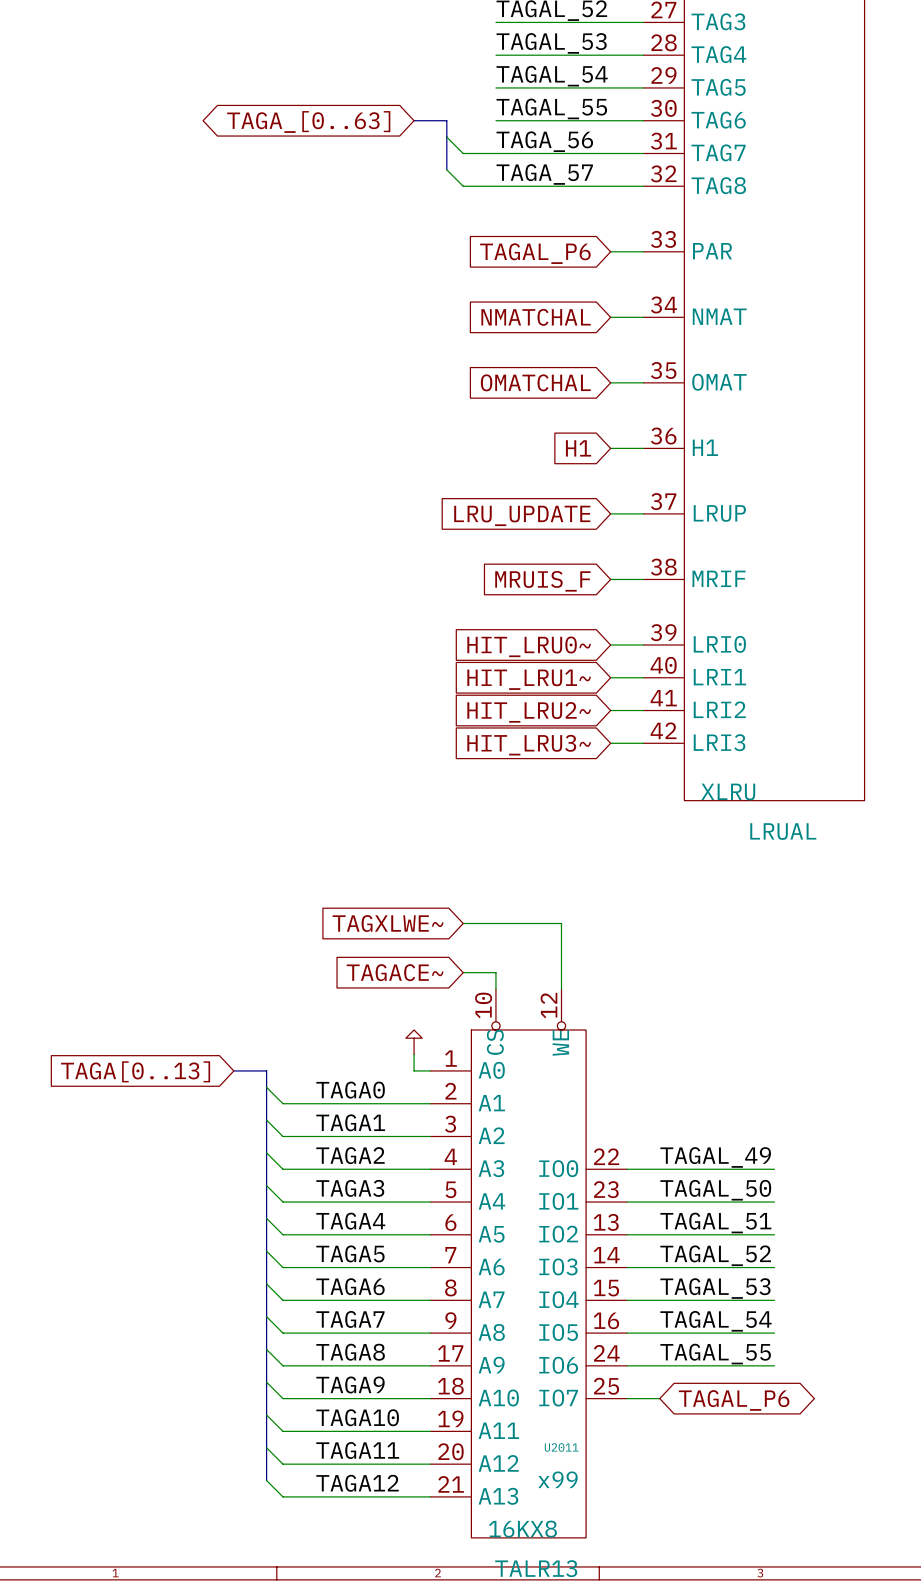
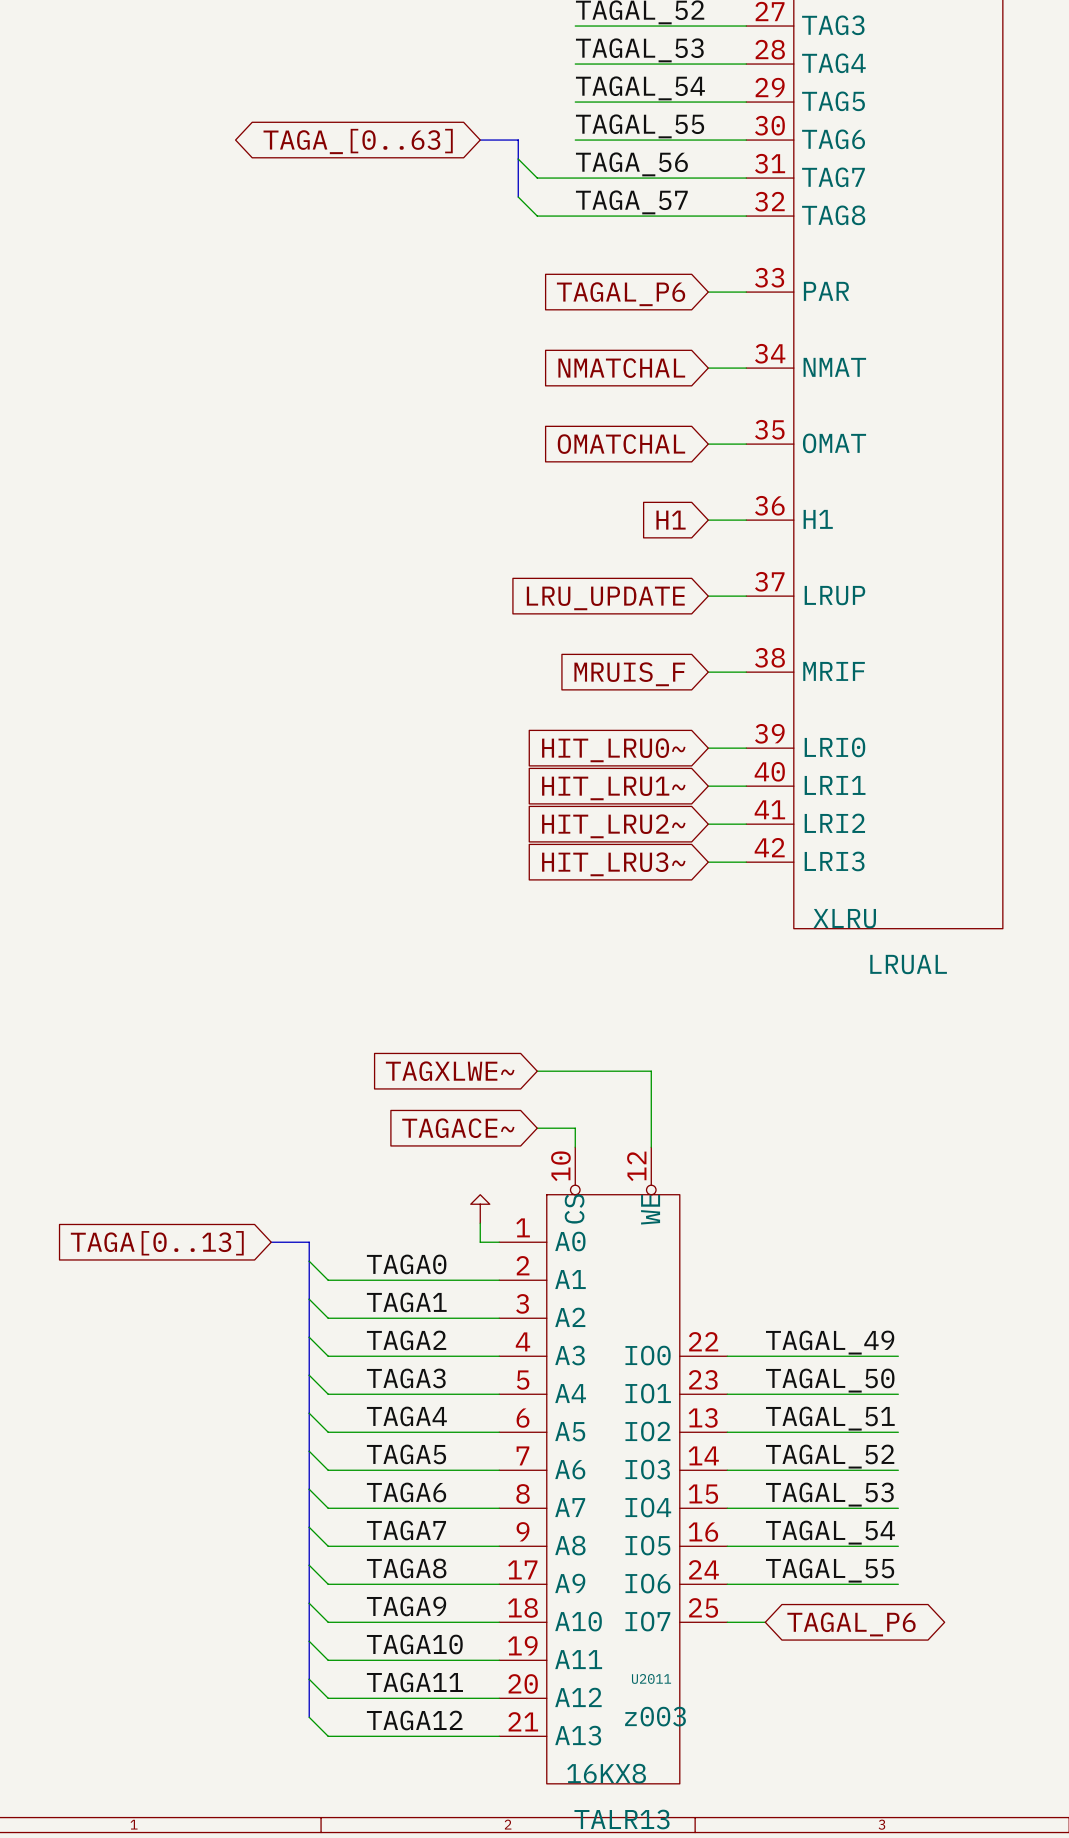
U2011 text: x99 (558, 1479) -> z003 (655, 1716)

